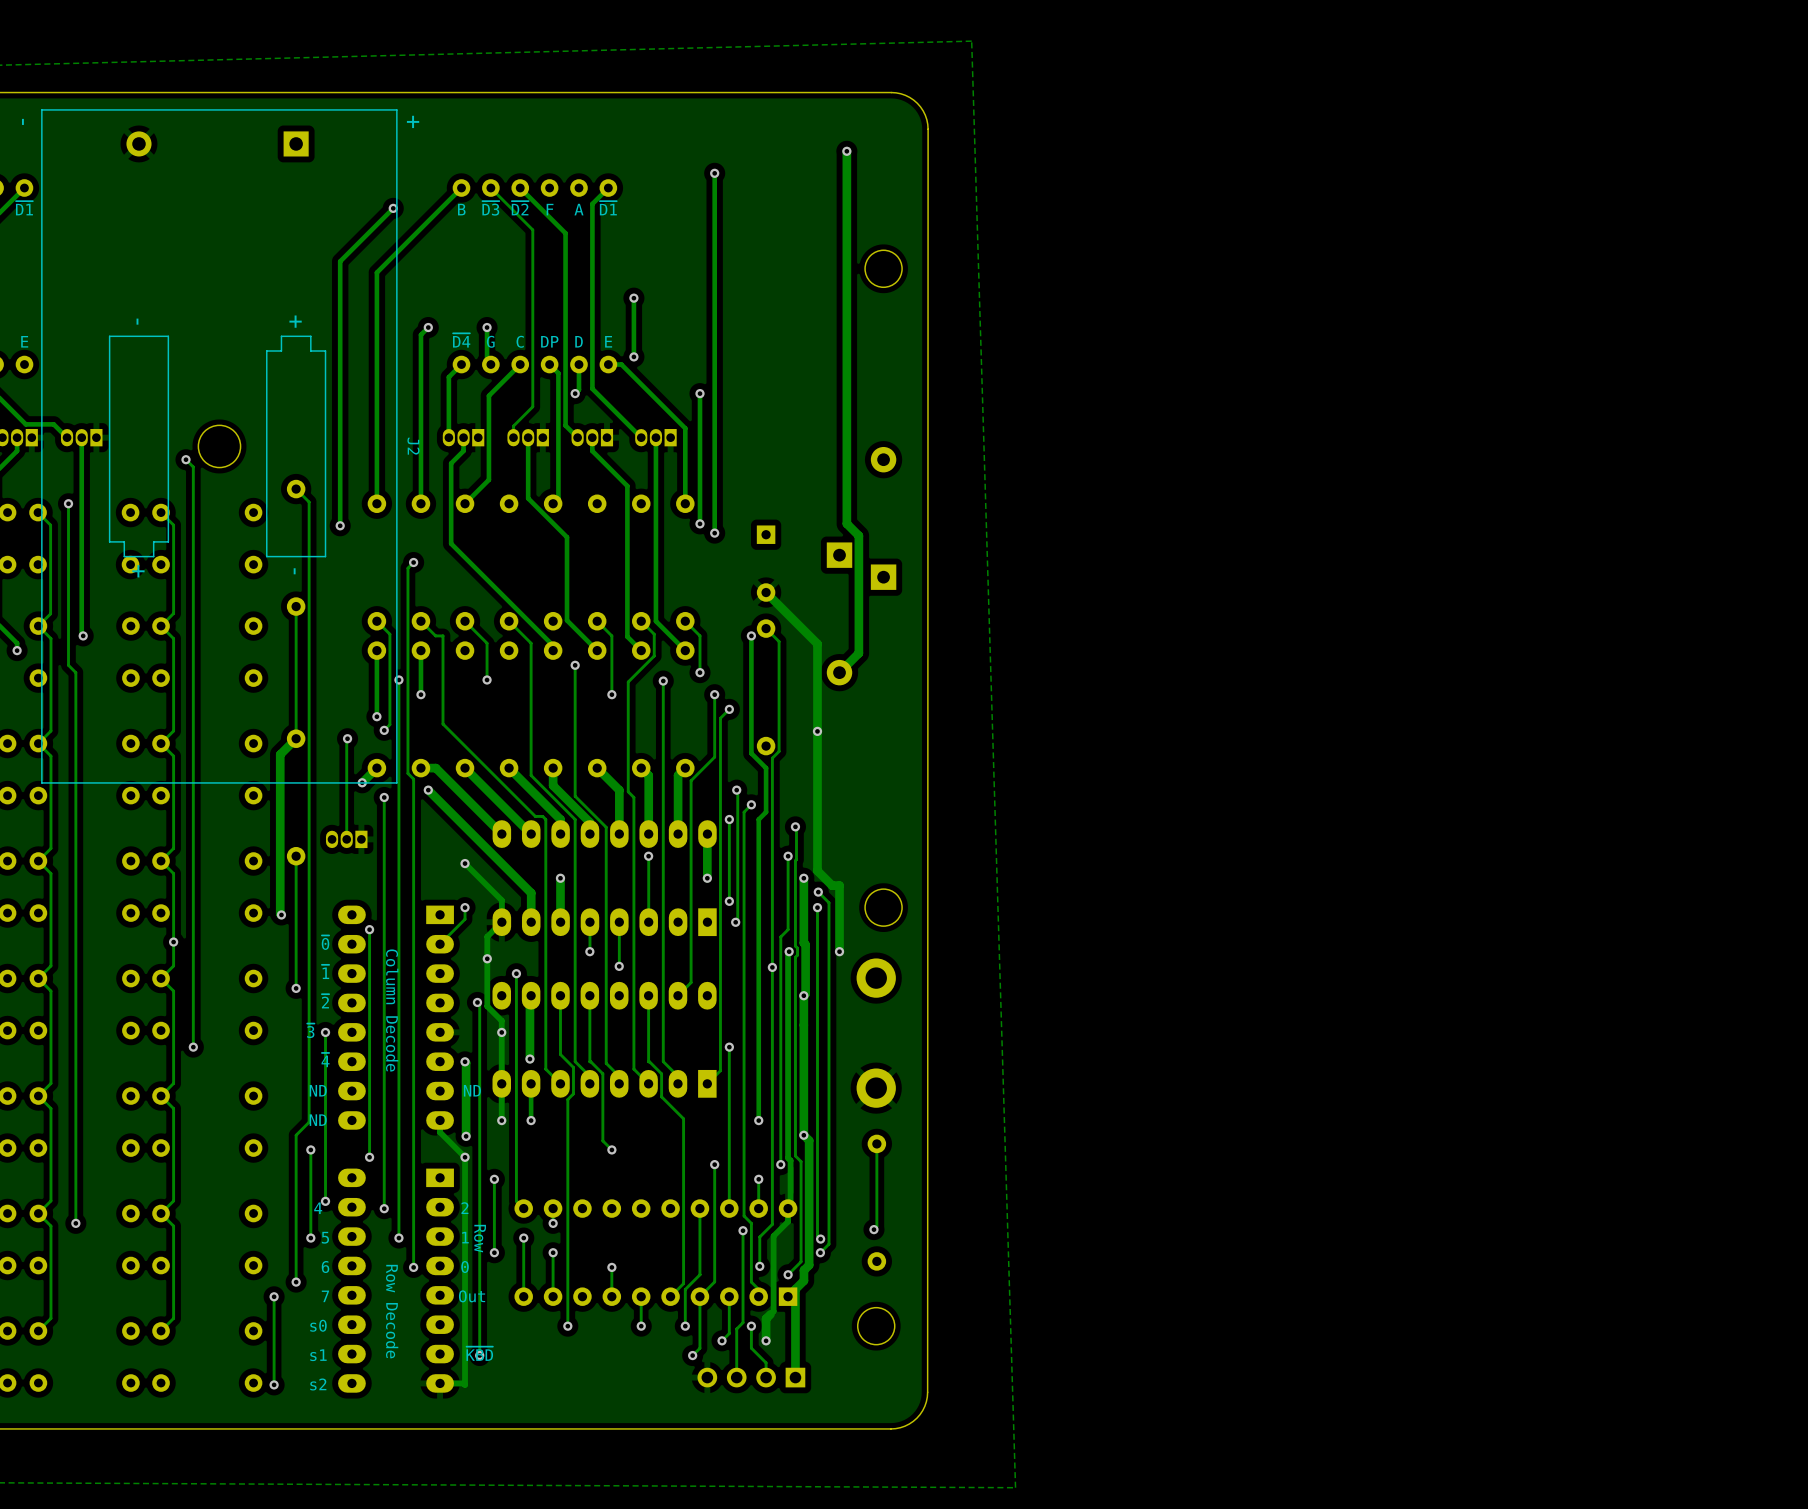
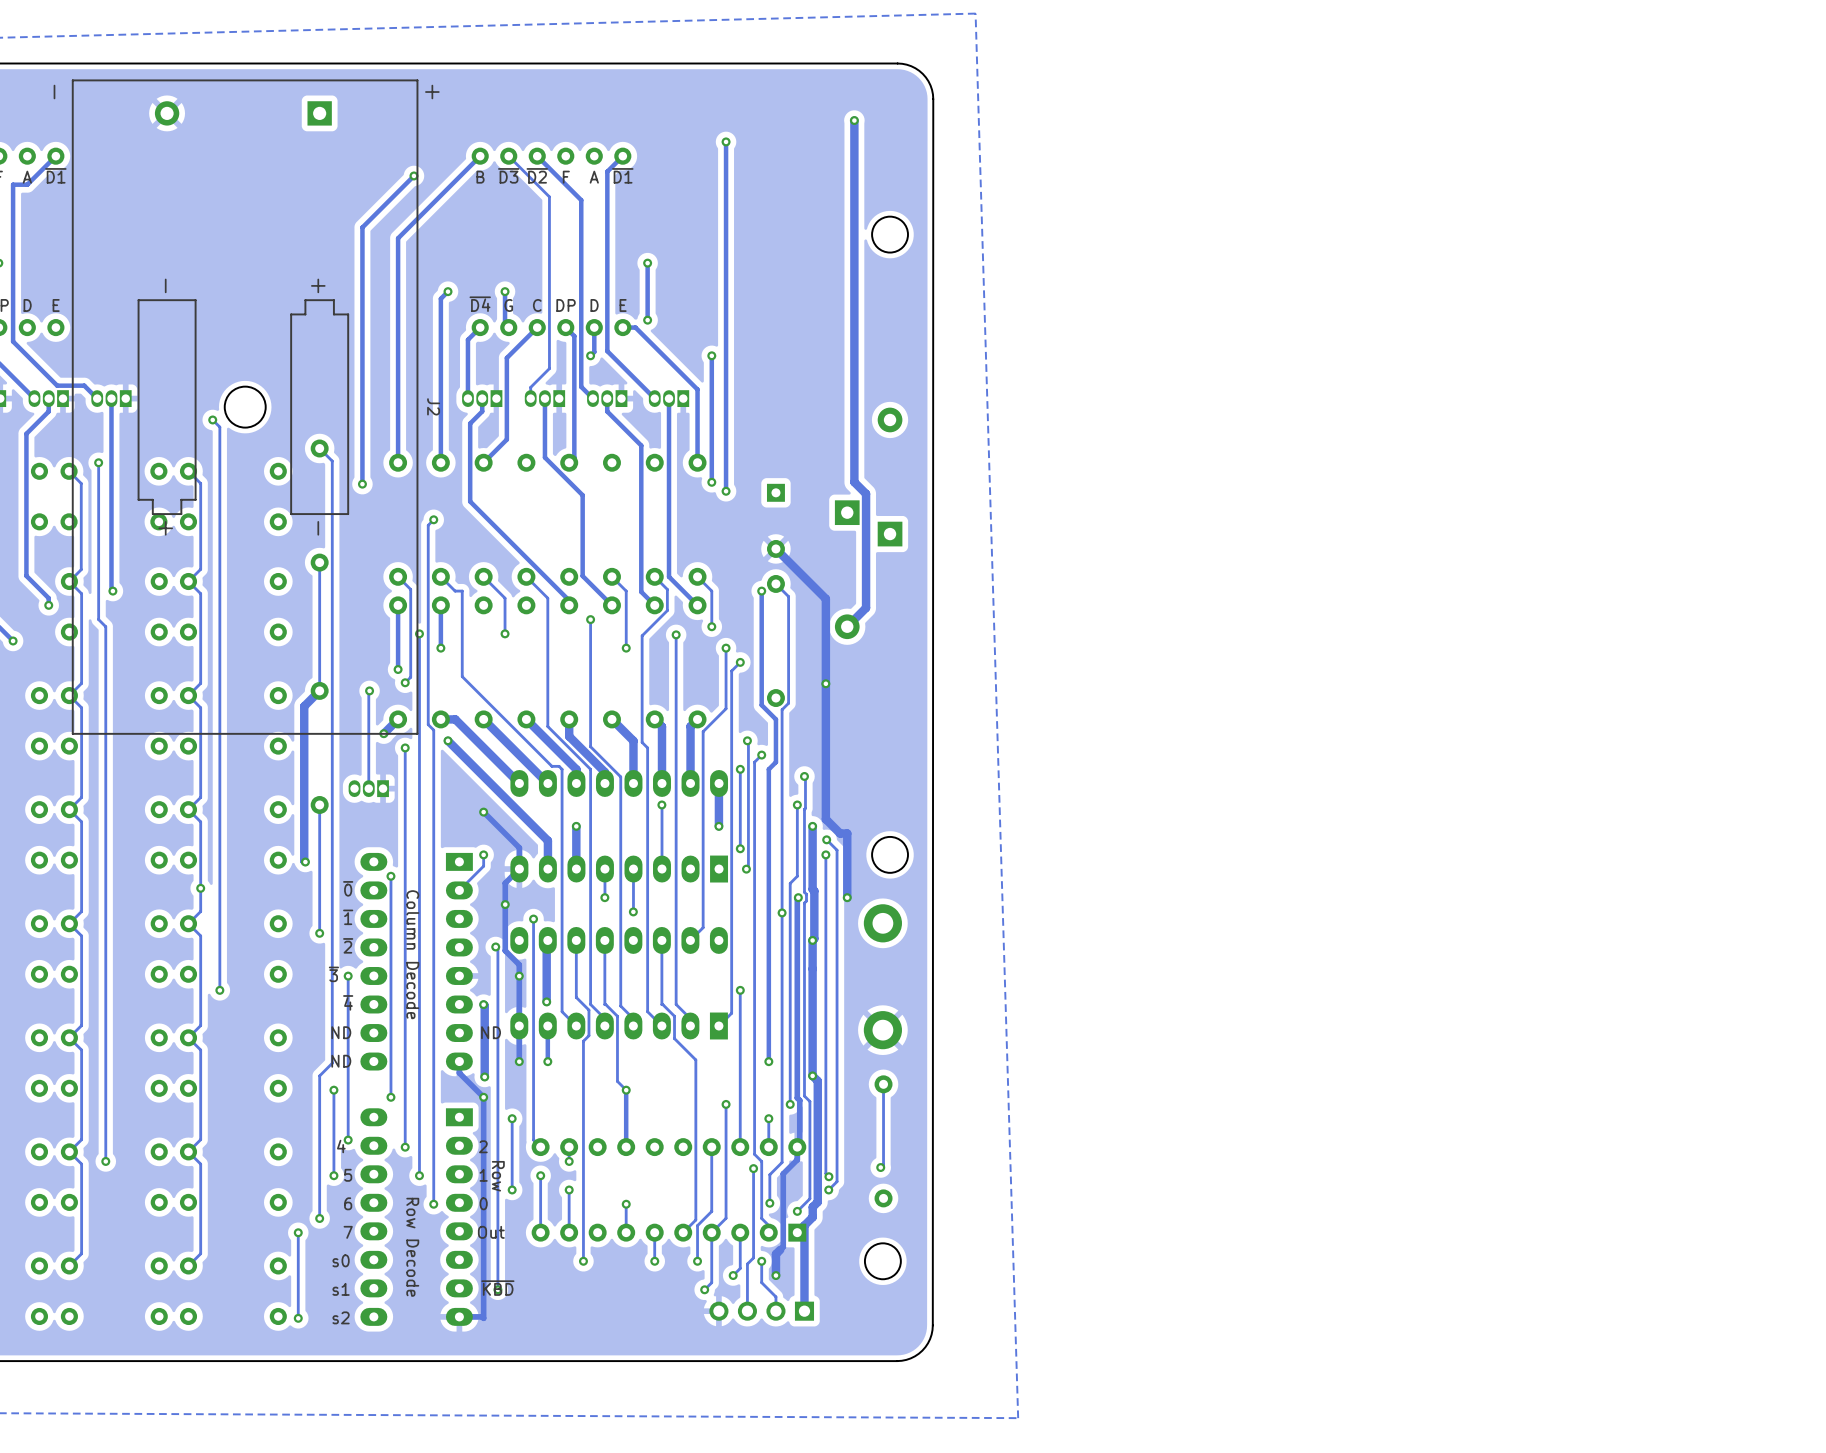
track: none -> (626, 1090) (626, 1147)

